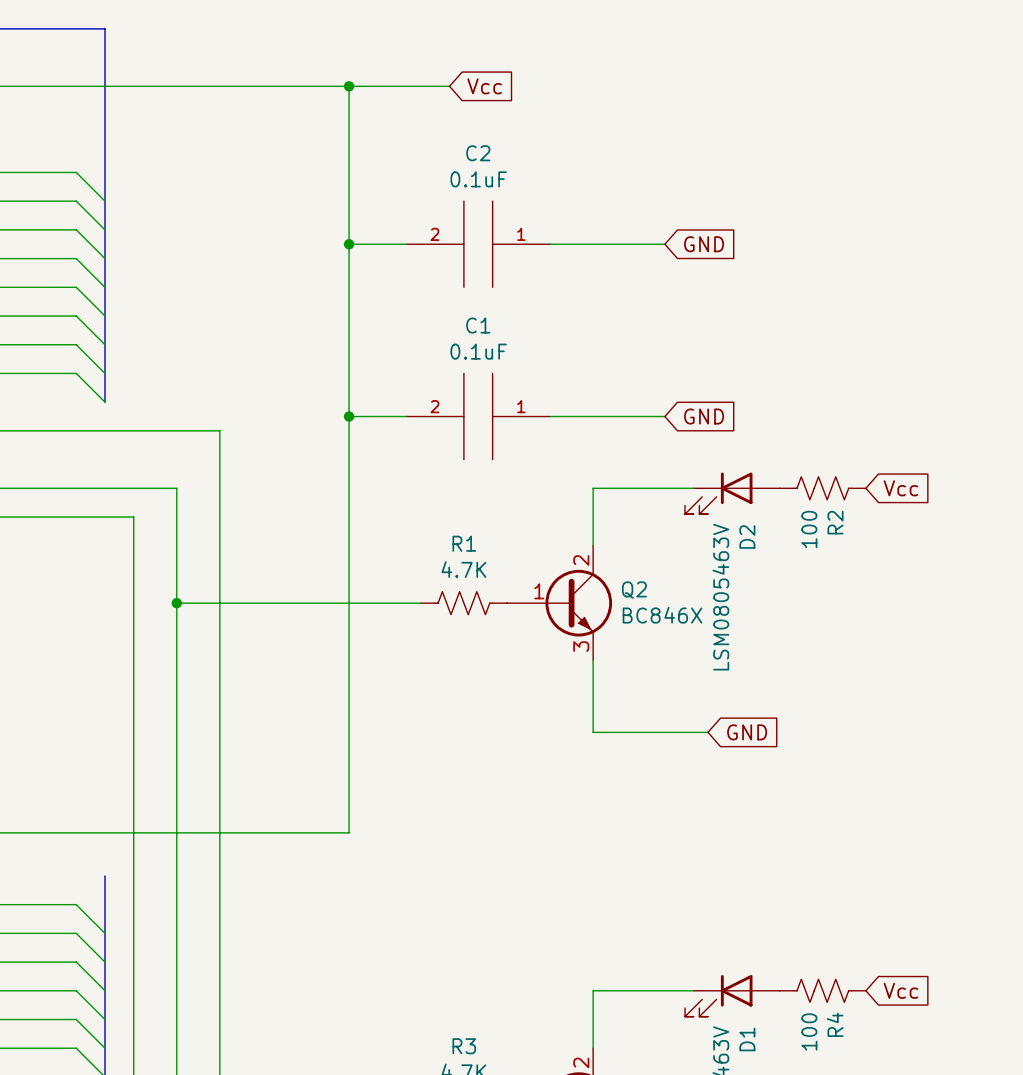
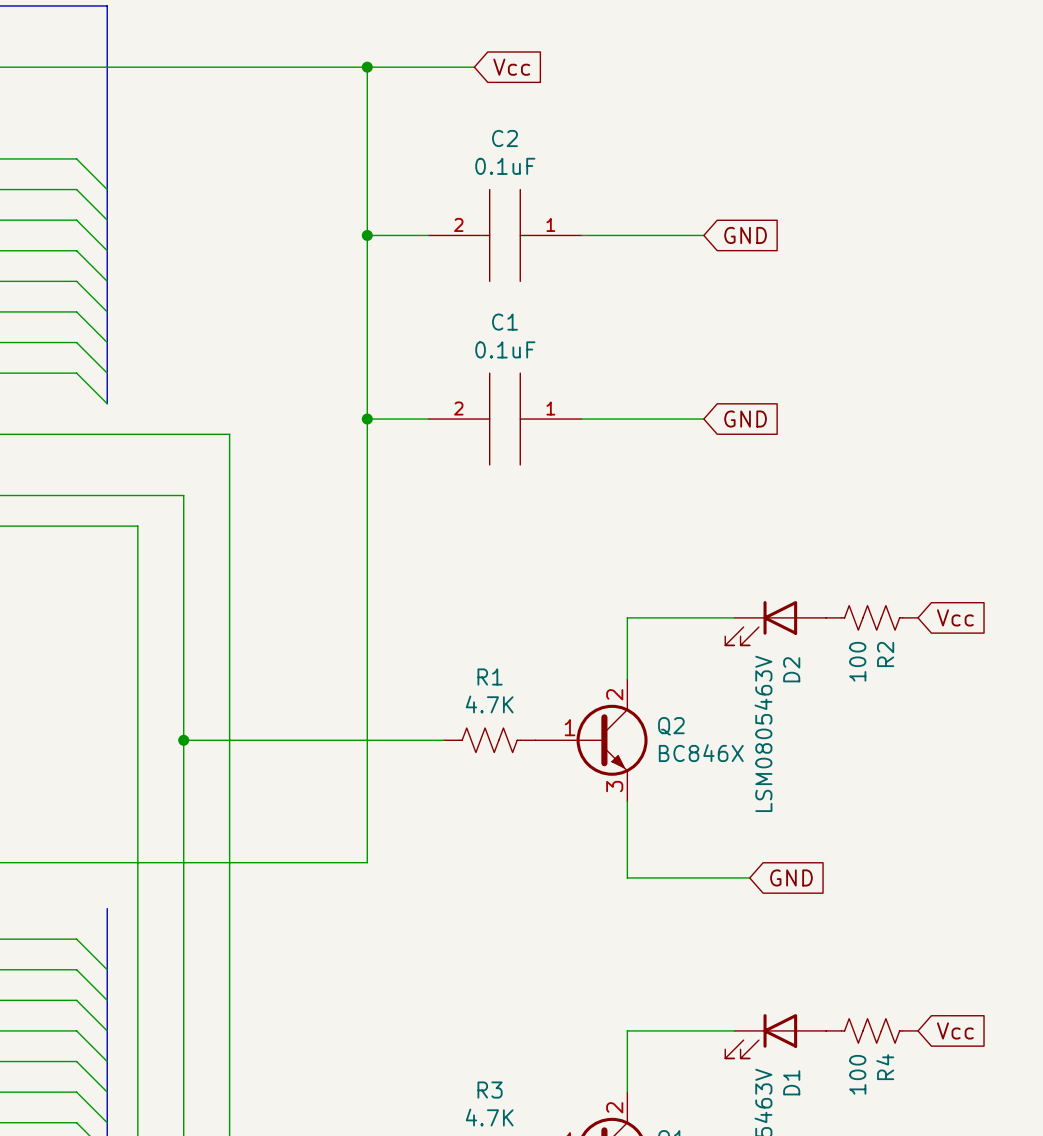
wire: (693, 488) (593, 488) (593, 545) -> none
R2 position: (822, 488) -> (872, 617)
global label position: Vcc (900, 488) -> Vcc (955, 617)
D2 position: (732, 493) -> (775, 623)
wire: (176, 603) (420, 603) -> (183, 740) (443, 740)
junction: (176, 603) -> none
R1 position: (463, 603) -> (489, 740)
Q2 position: (559, 603) -> (591, 740)
wire: (593, 660) (593, 732) (707, 732) -> (627, 679) (627, 617) (734, 617)
junction: none -> (183, 740)
global label position: GND (747, 732) -> GND (791, 877)
wire: none -> (627, 801) (627, 877) (749, 877)

